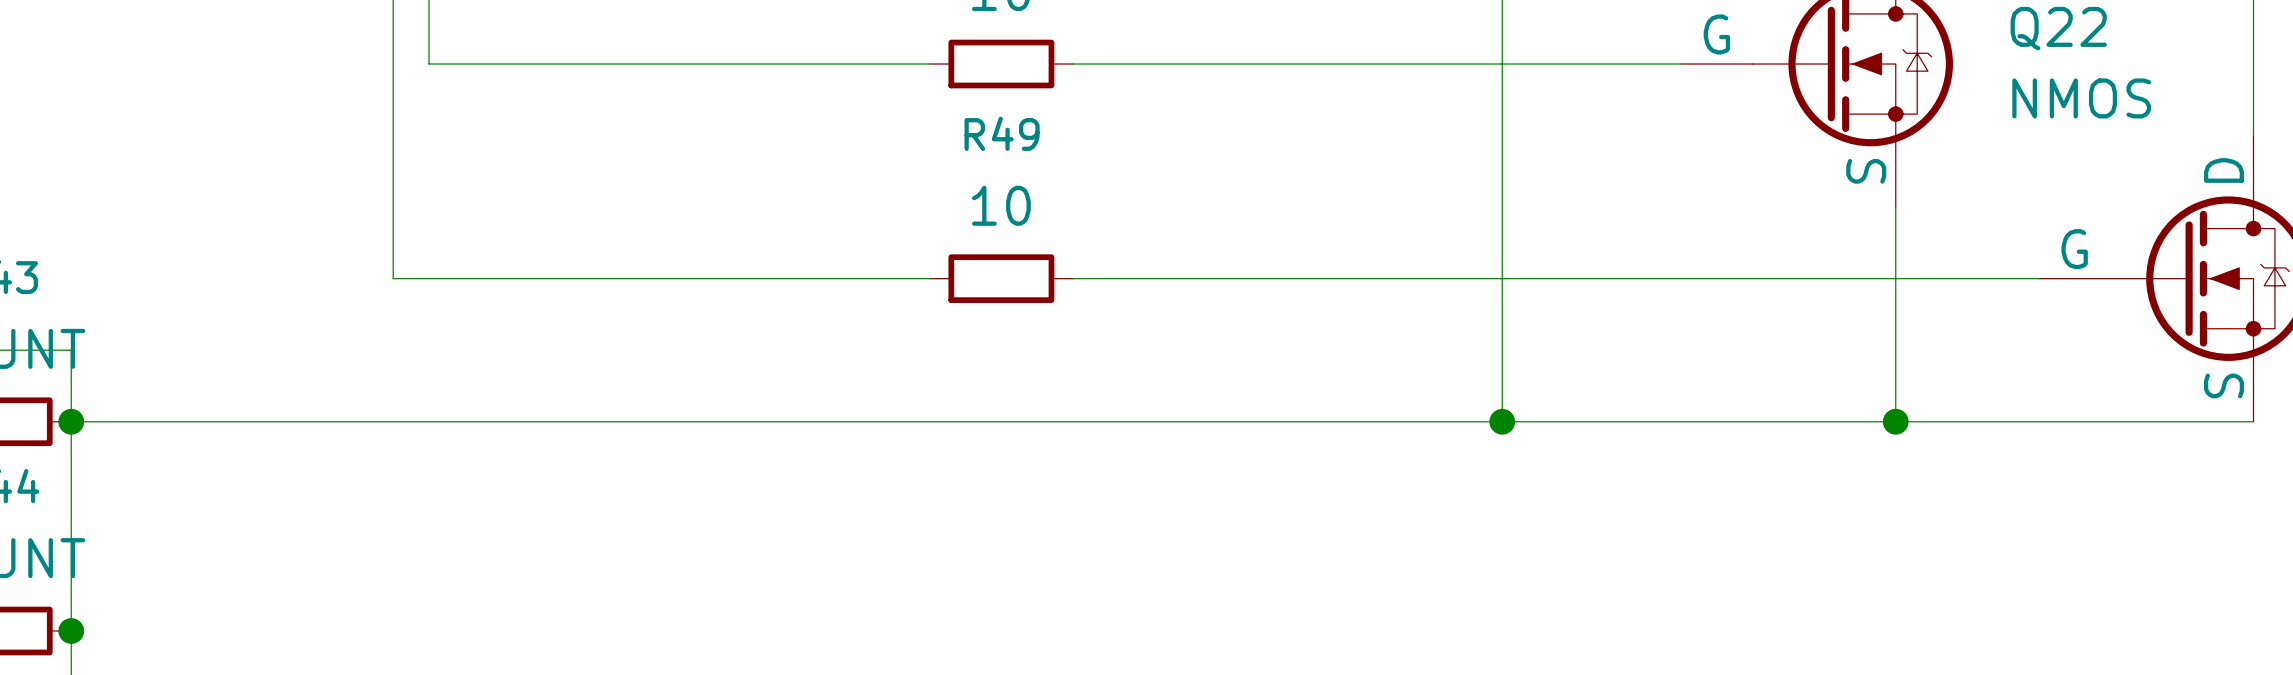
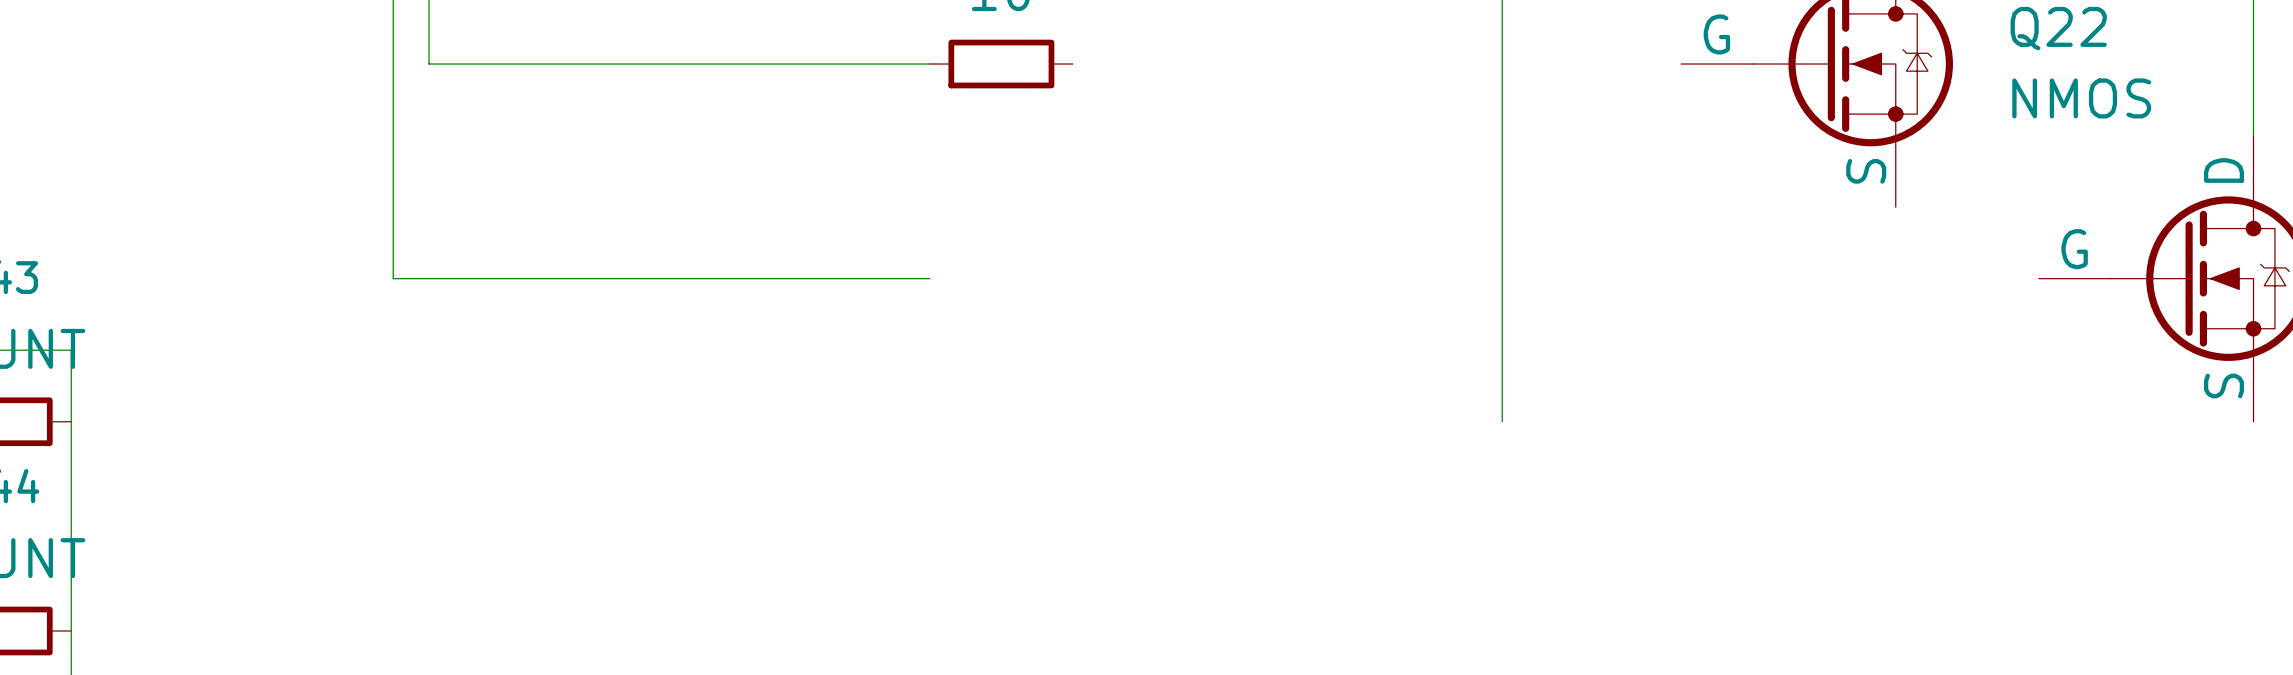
wire: (1072, 64) (1681, 64) -> none
wire: (1895, 207) (1895, 421) -> none
R49: 10 (1001, 278) -> none
wire: (1072, 278) (2038, 278) -> none
wire: (71, 421) (2253, 421) -> none
junction: (71, 421) -> none
junction: (1502, 421) -> none
junction: (1895, 421) -> none
junction: (71, 631) -> none

